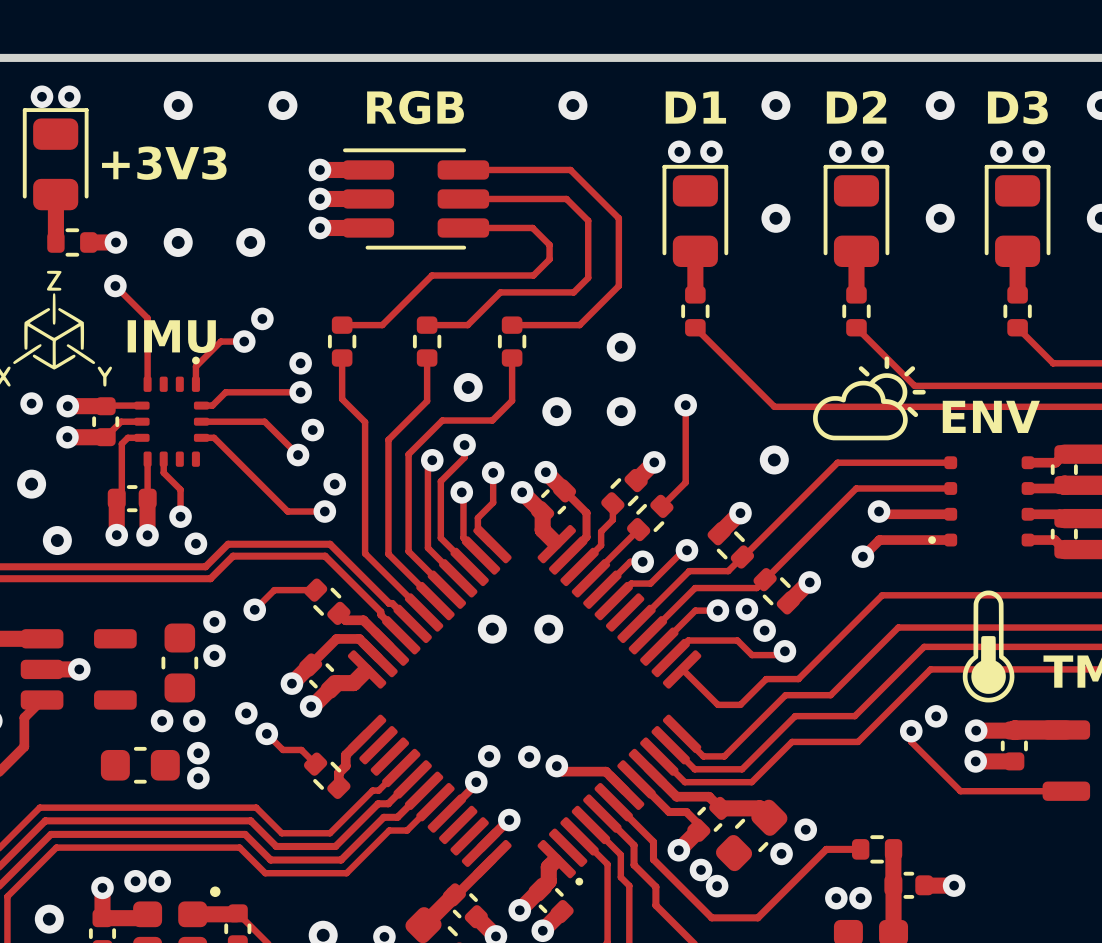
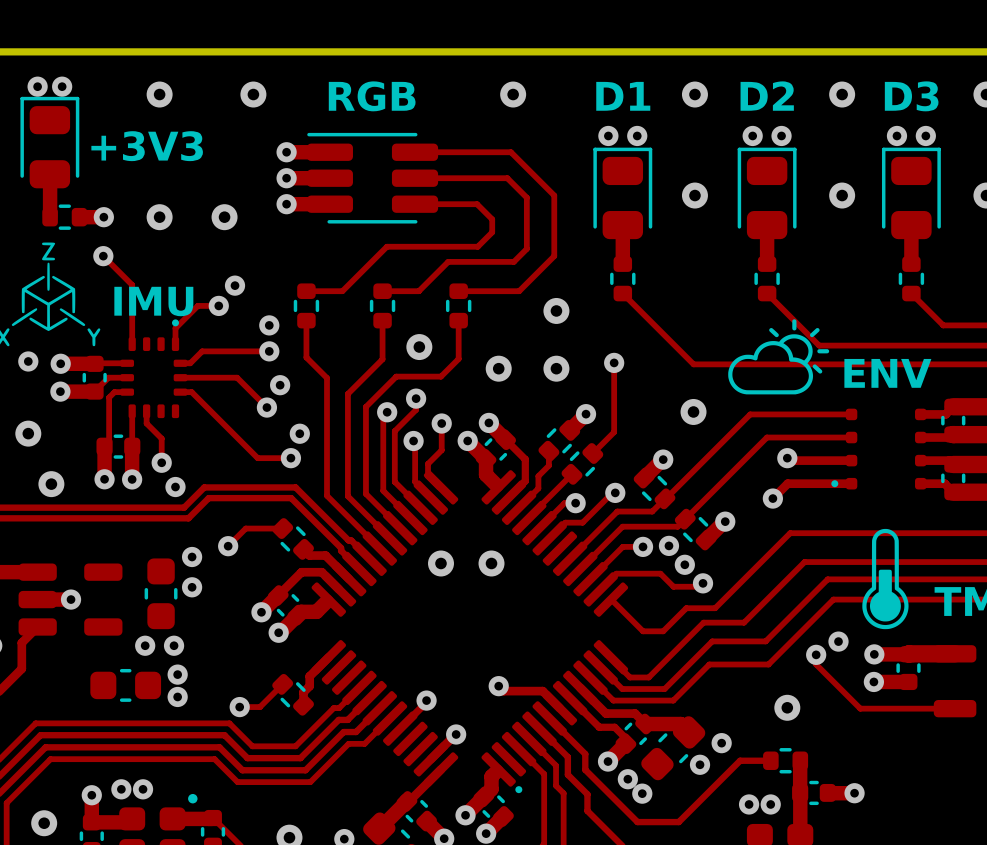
via: (246, 713) -> none
track: (266, 733) (282, 749) (301, 749) (315, 764) -> (239, 707) (260, 707) (282, 684)
via: (266, 733) -> none
via: (489, 756) -> none
via: (529, 756) -> none
via: none -> (239, 707)
via: none -> (787, 707)

